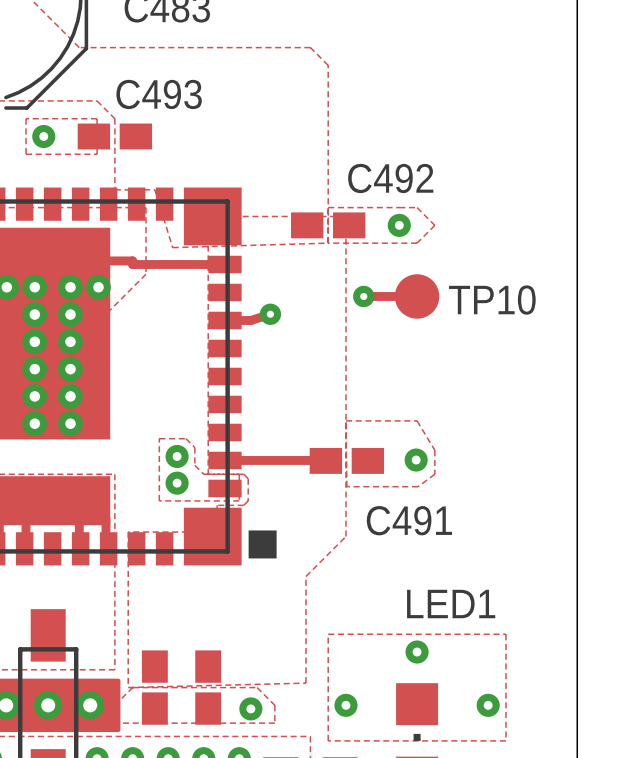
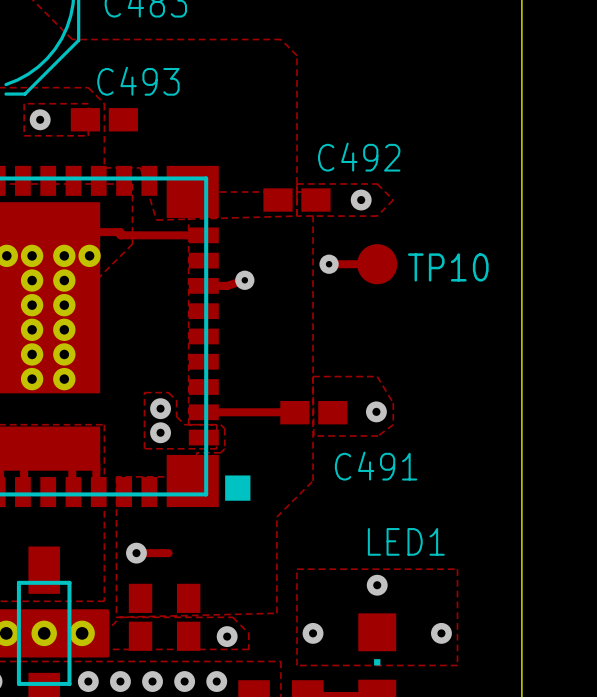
track: none -> (136, 553) (168, 553)
via: none -> (136, 553)

